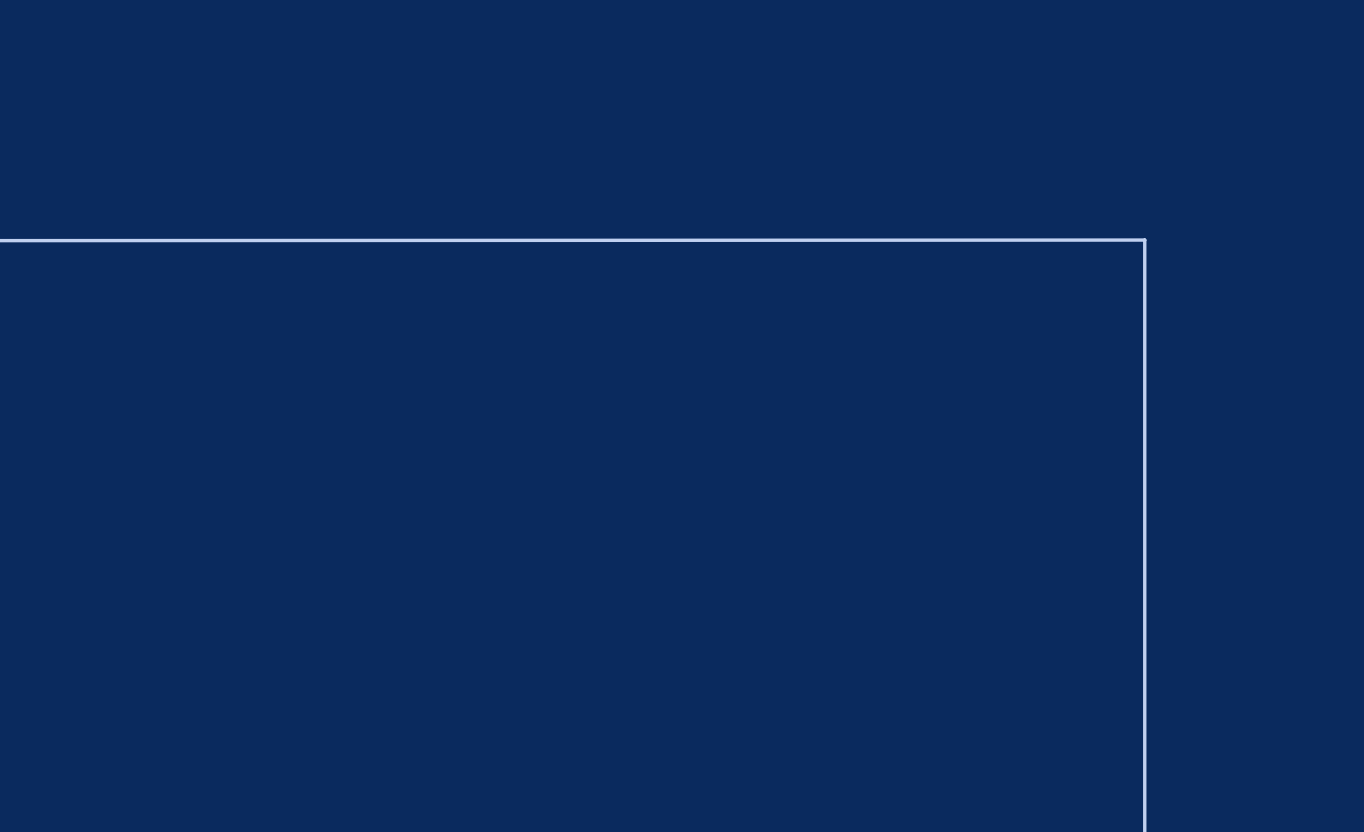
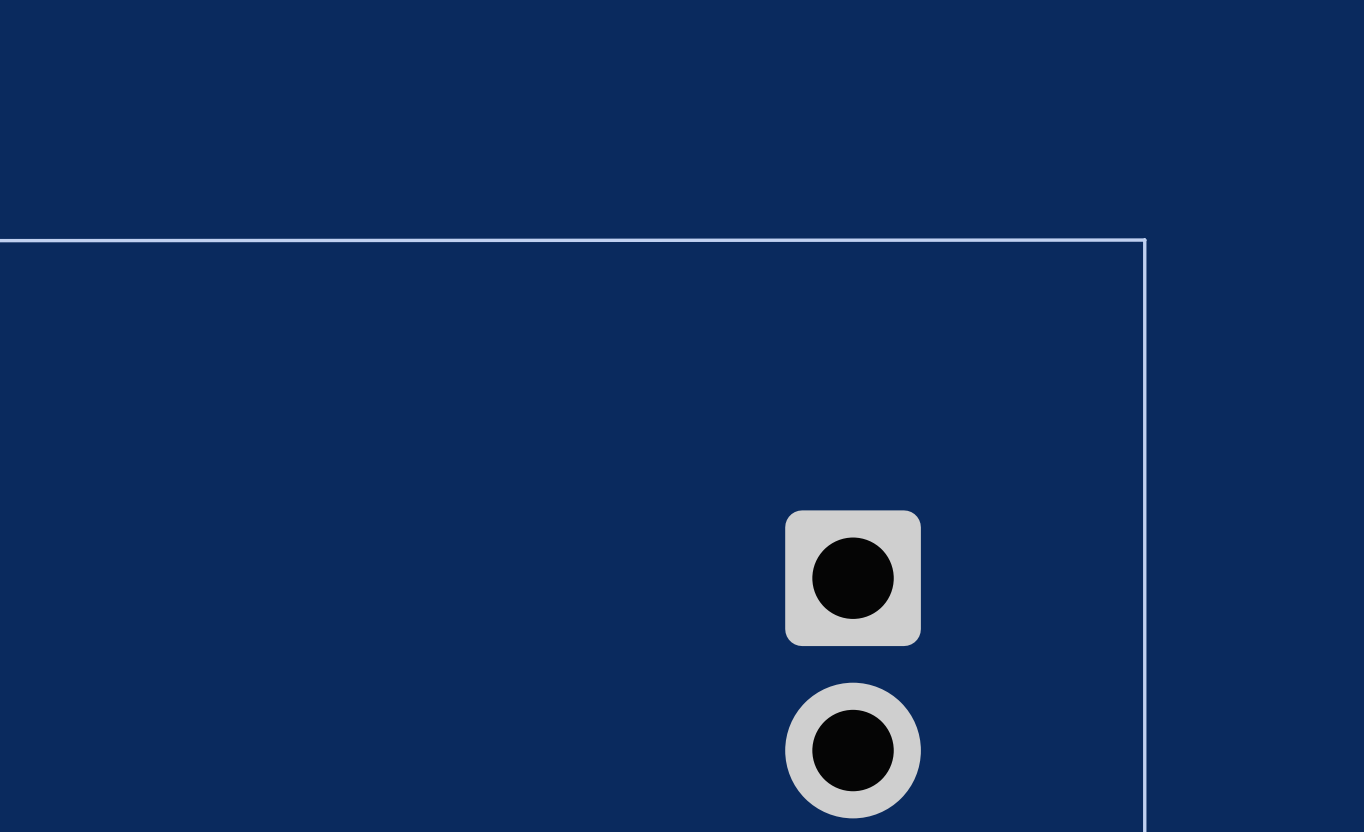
part: none -> (853, 664)

